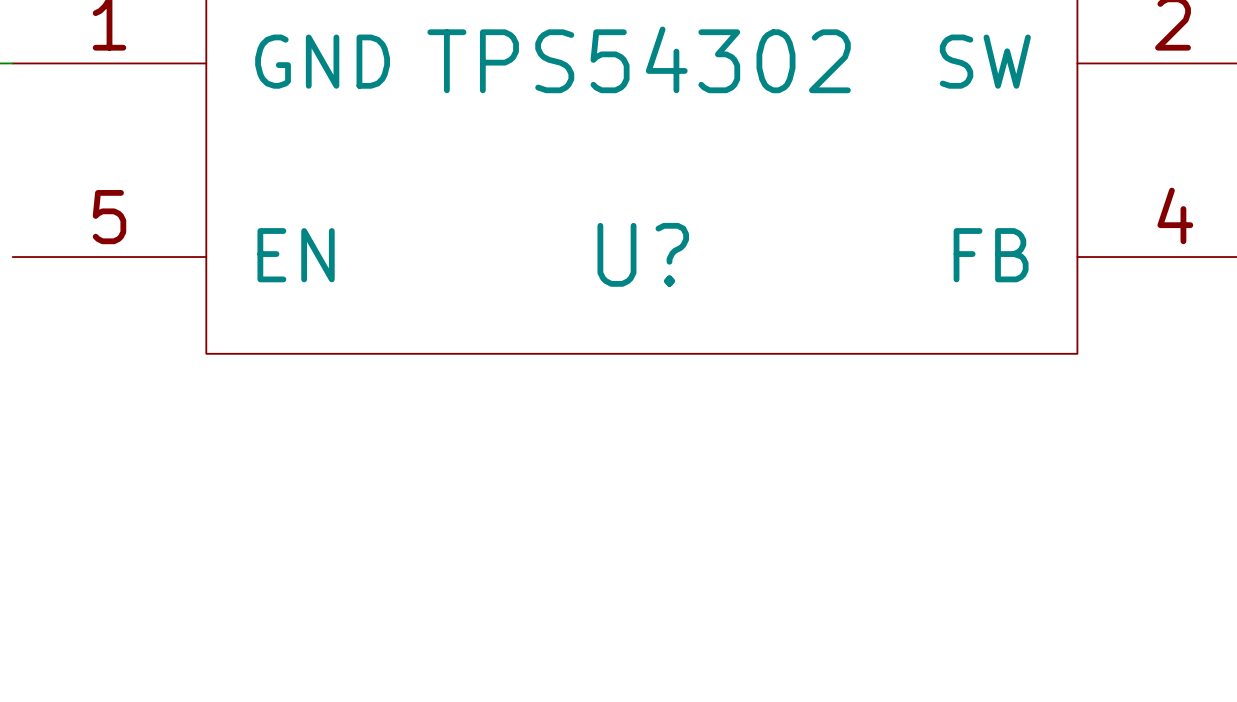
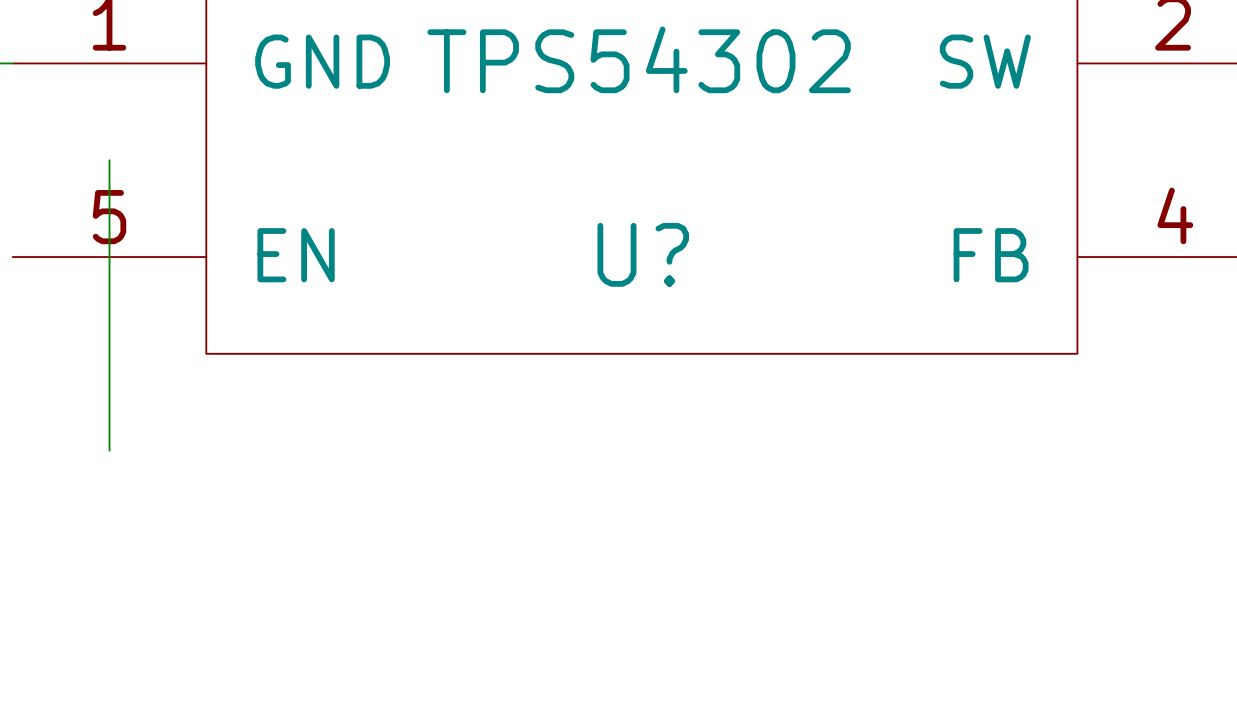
wire: none -> (109, 160) (109, 450)

